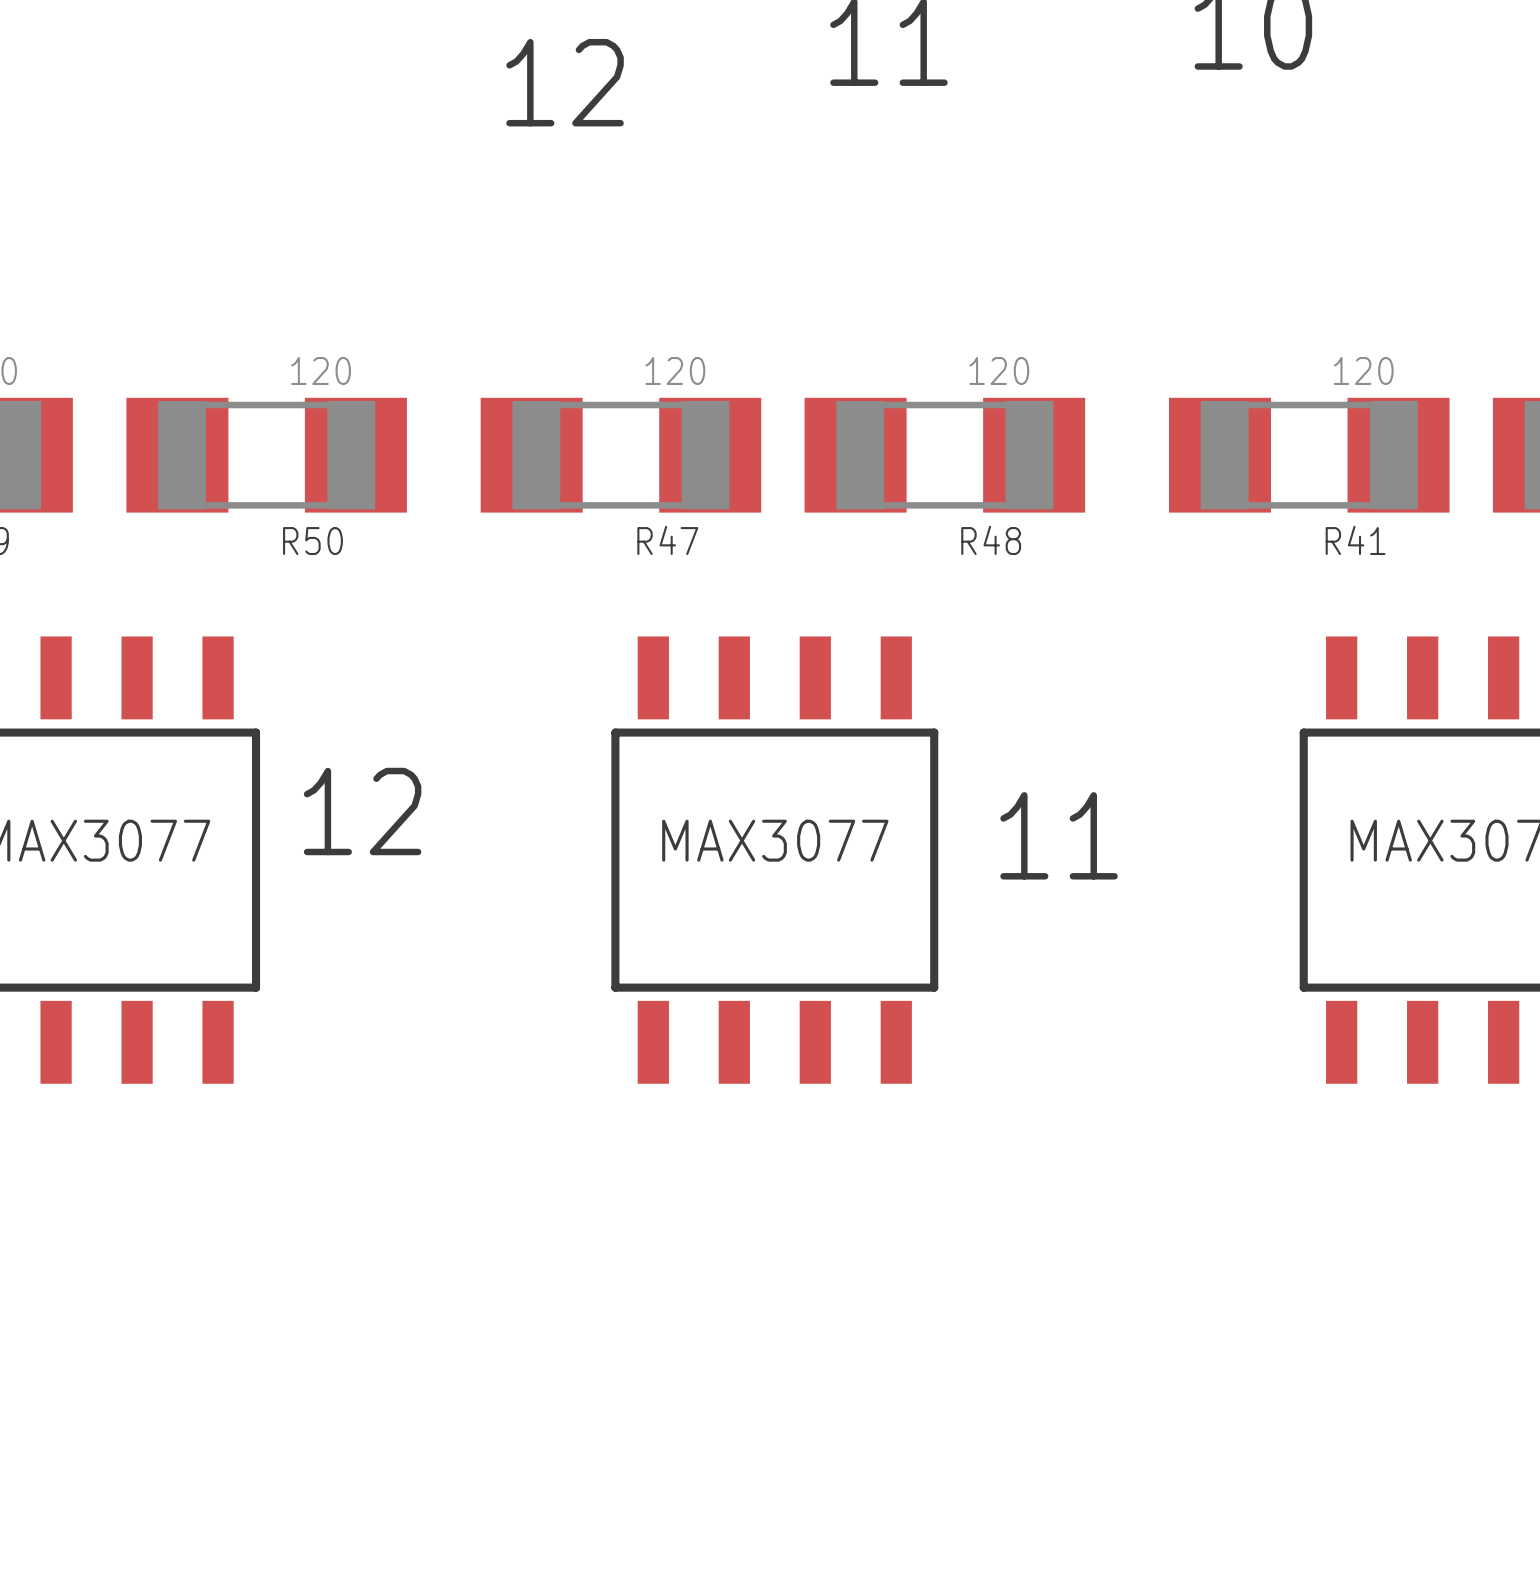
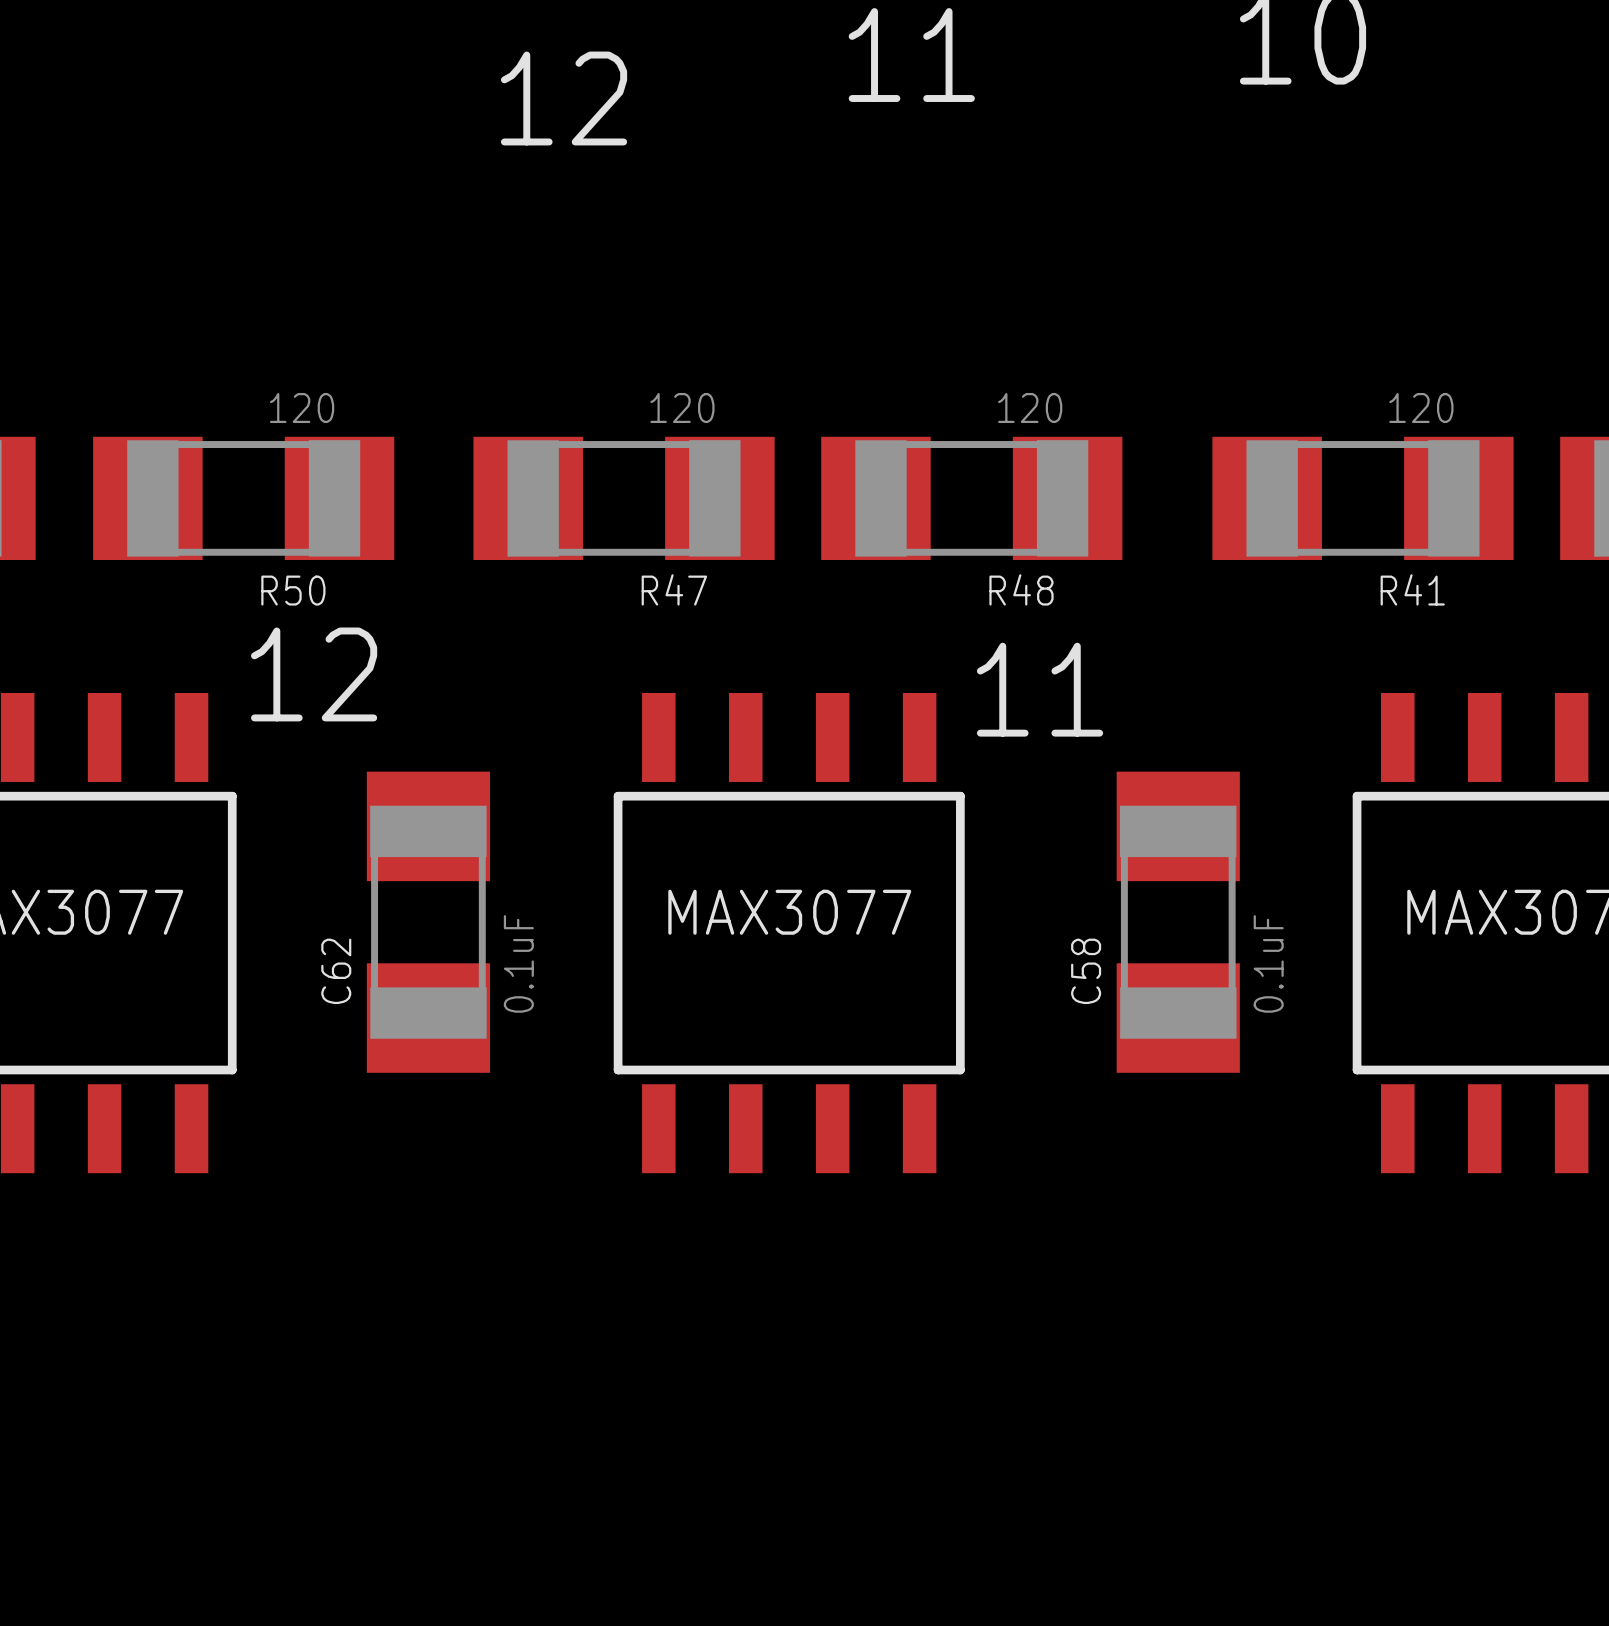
text position: 12 (362, 811) -> 12 (314, 674)
text position: 11 (1059, 835) -> 11 (1040, 689)
C62: none -> 0.1uF (428, 922)
C58: none -> 0.1uF (1178, 922)

